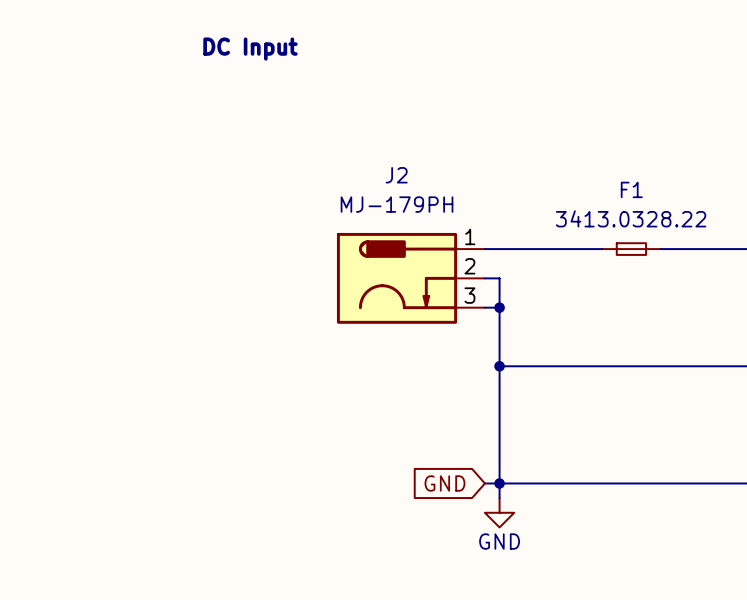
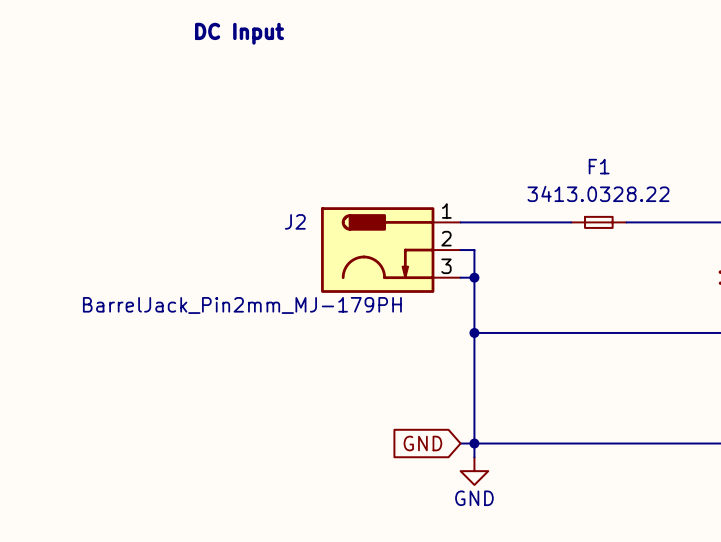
J2 name position: J2 (396, 175) -> J2 (295, 221)
J2 text: MJ-179PH (397, 204) -> none
J2 value: none -> BarrelJack_Pin2mm_MJ-179PH (242, 305)

